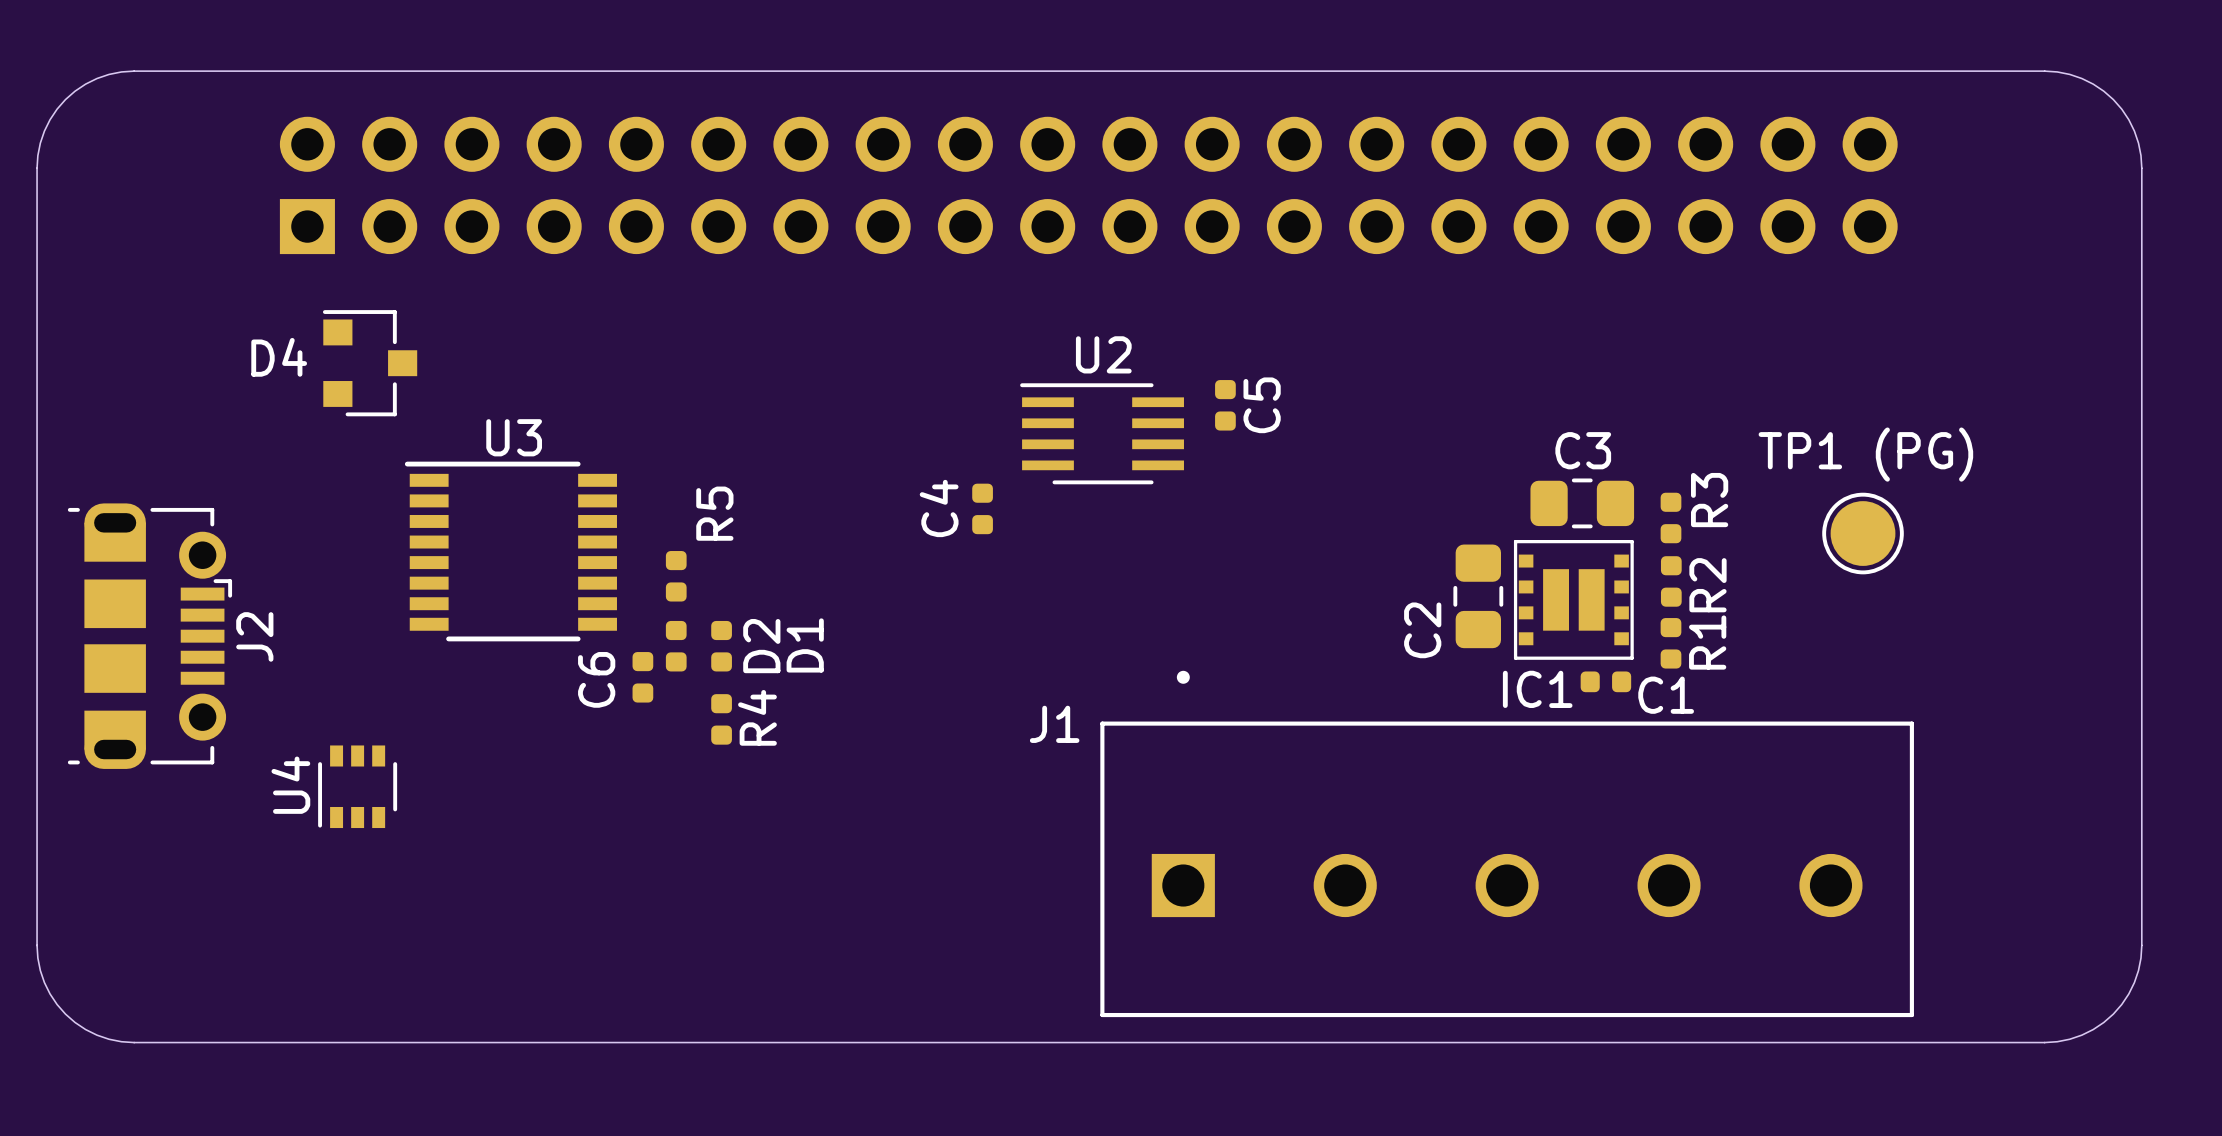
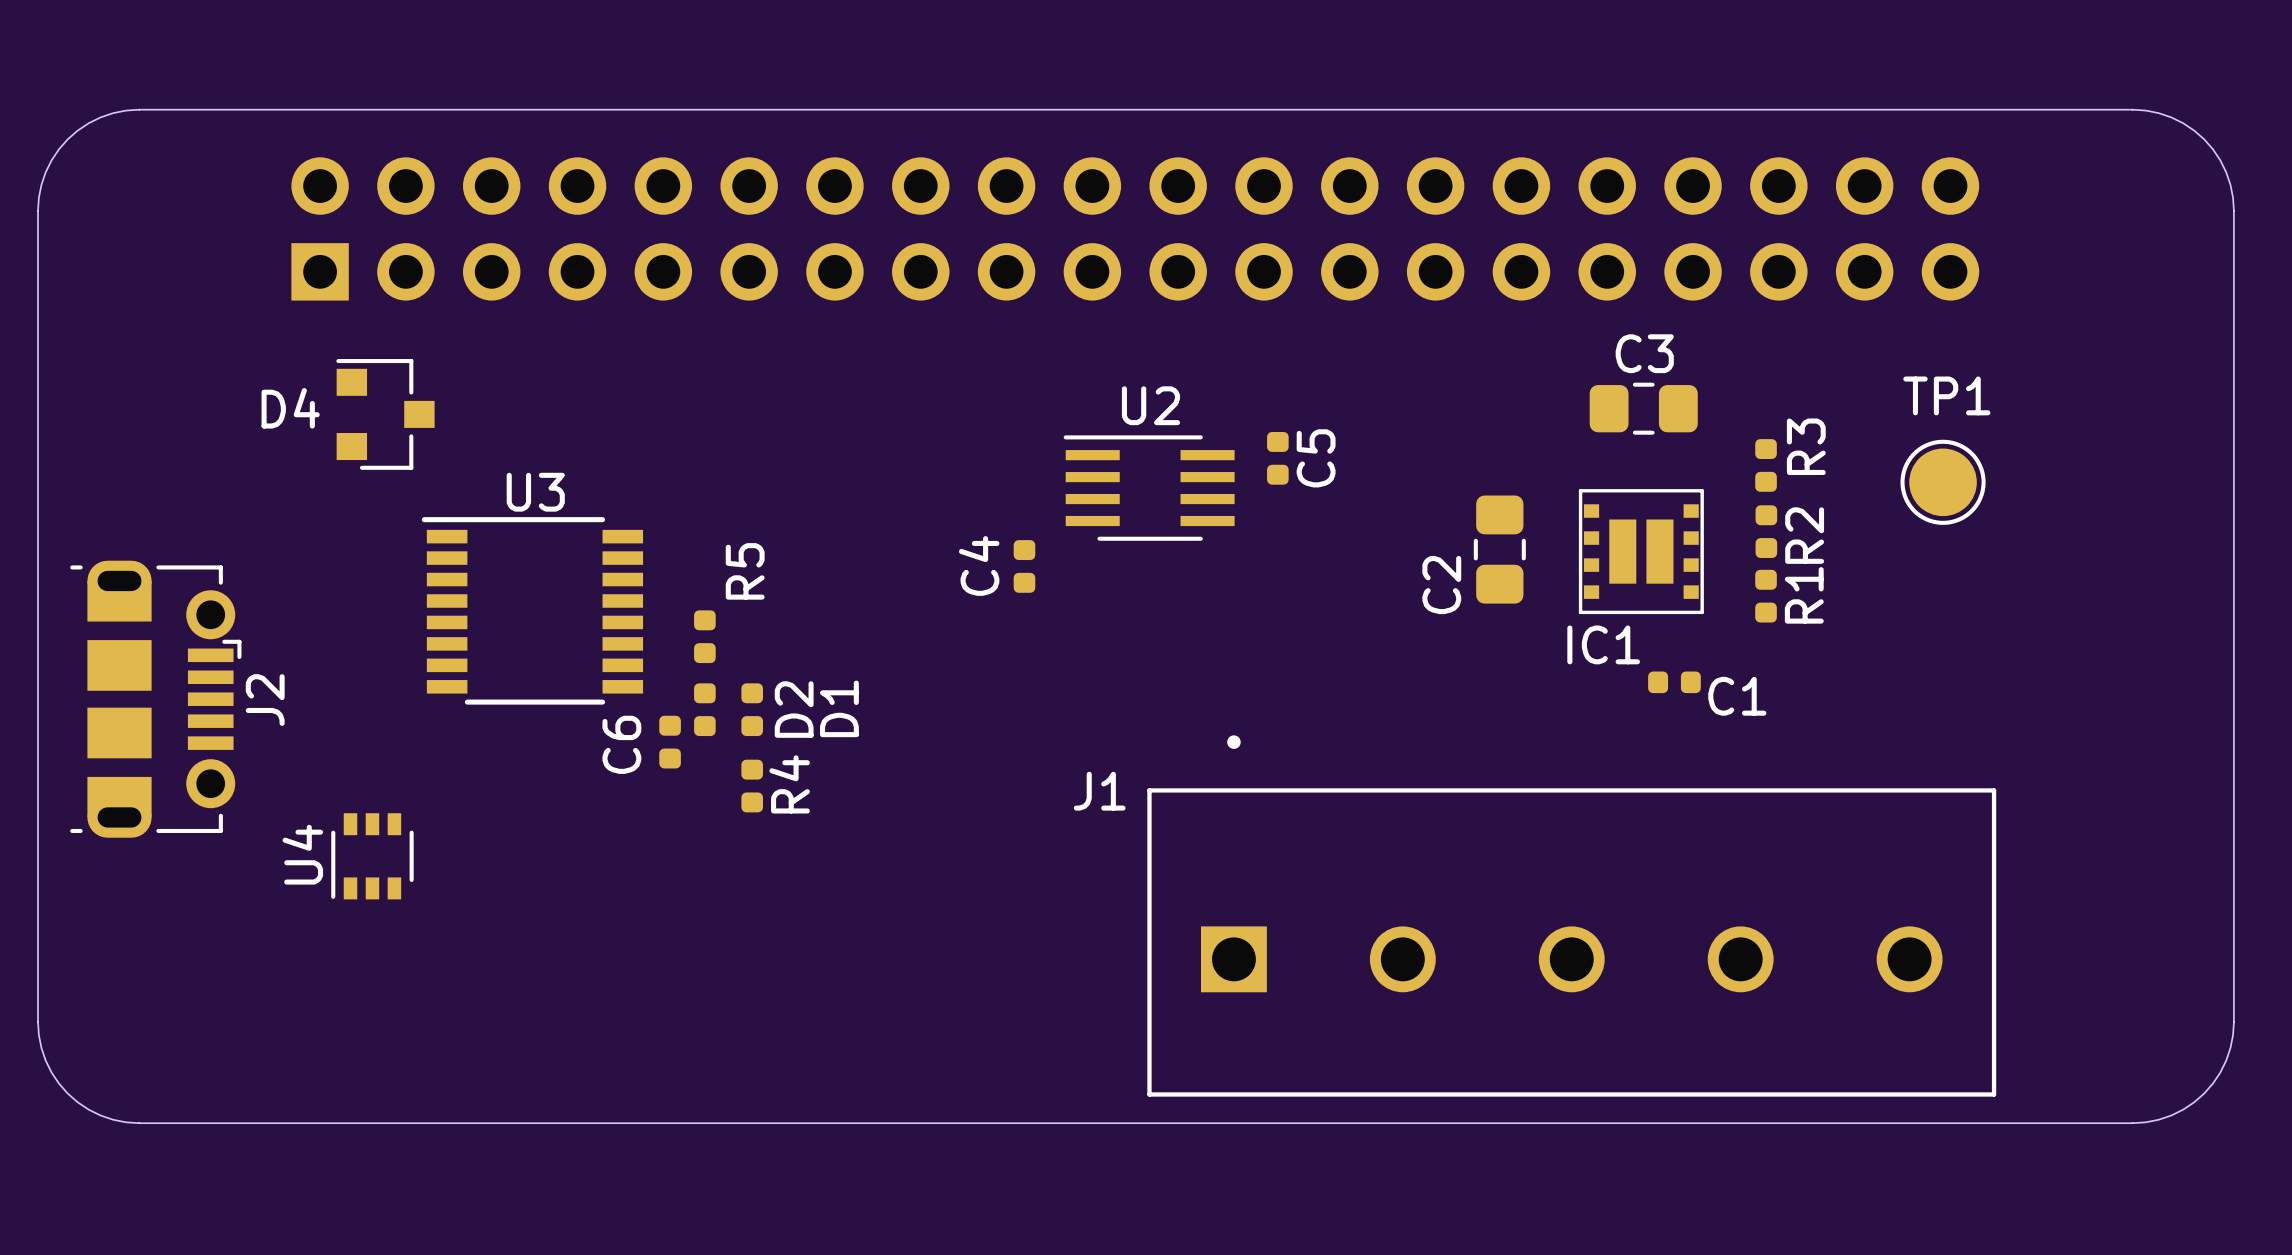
TP1: none -> (1943, 482)
C3 position: (1582, 503) -> (1643, 408)
R3 position: (1670, 517) -> (1766, 465)
TP1 (PG): (1863, 533) -> none
R2 position: (1671, 581) -> (1766, 531)
C2 position: (1478, 596) -> (1499, 549)
IC1 position: (1573, 599) -> (1641, 551)
R1 position: (1670, 643) -> (1766, 596)
C1 position: (1605, 681) -> (1674, 682)

